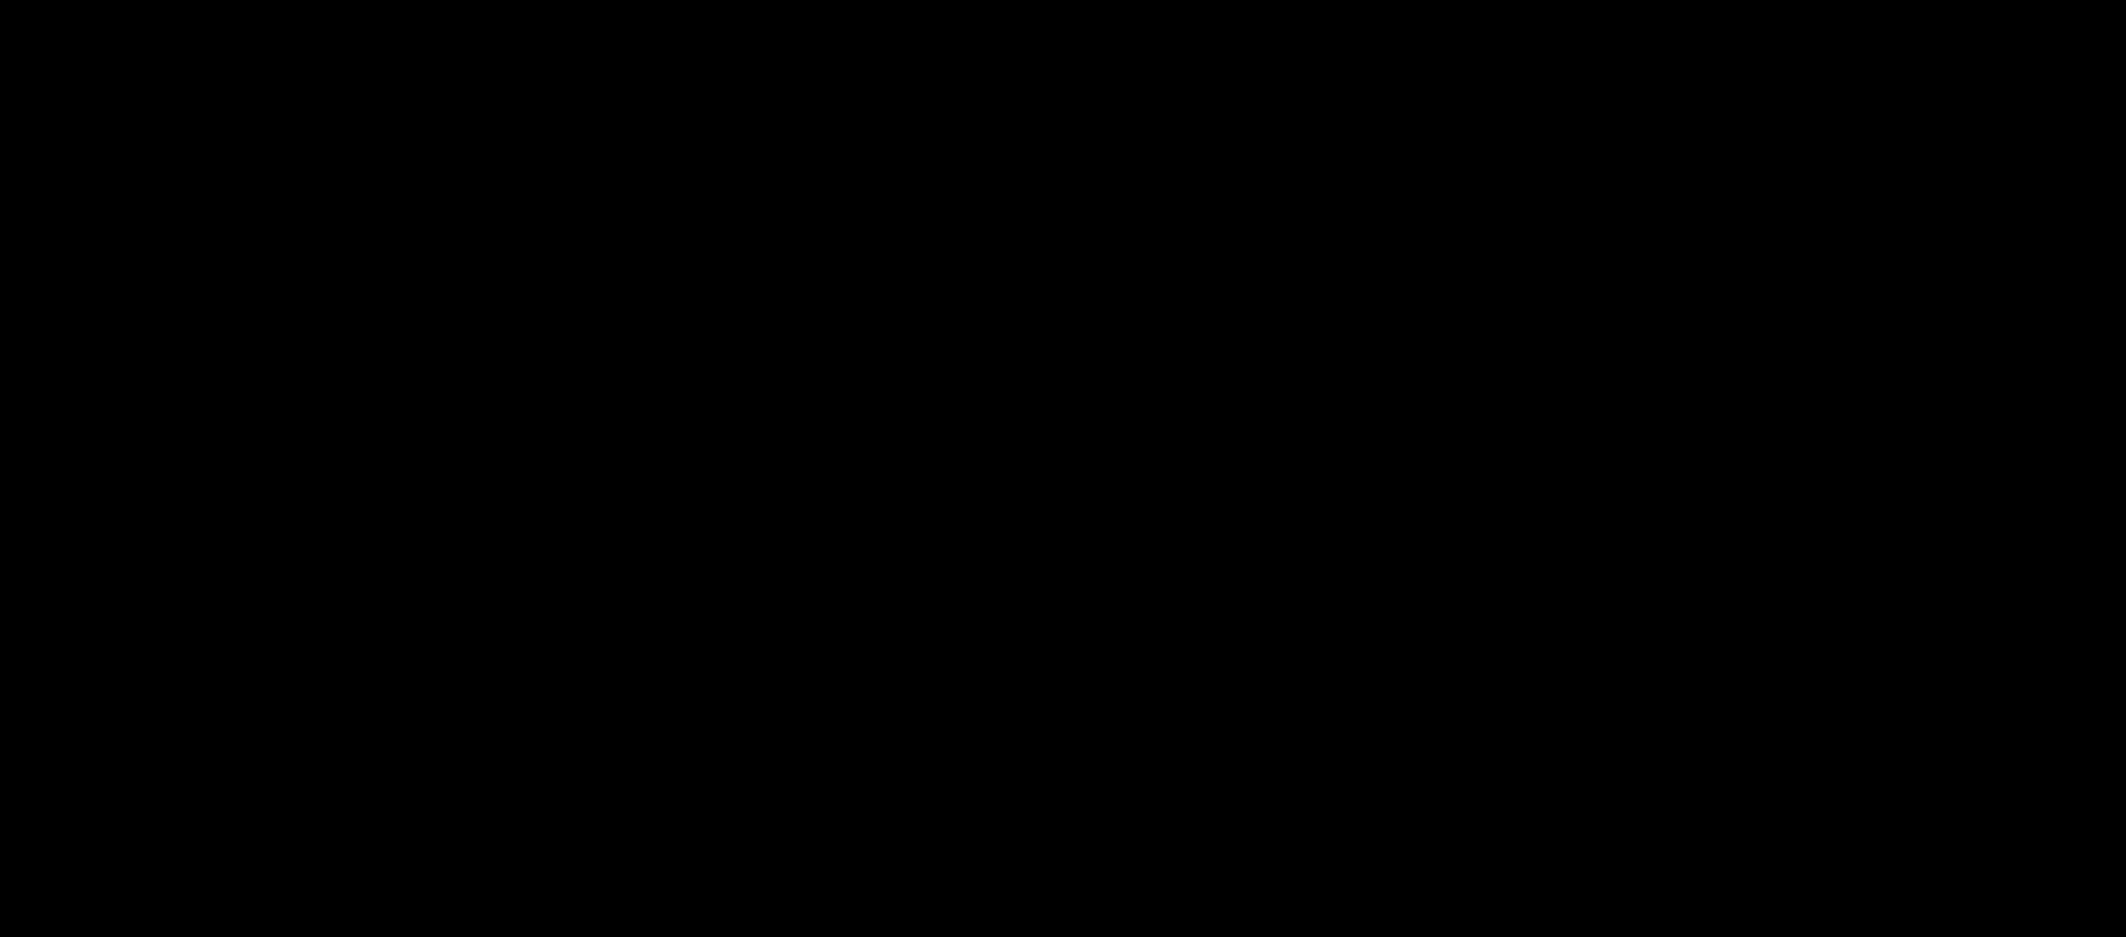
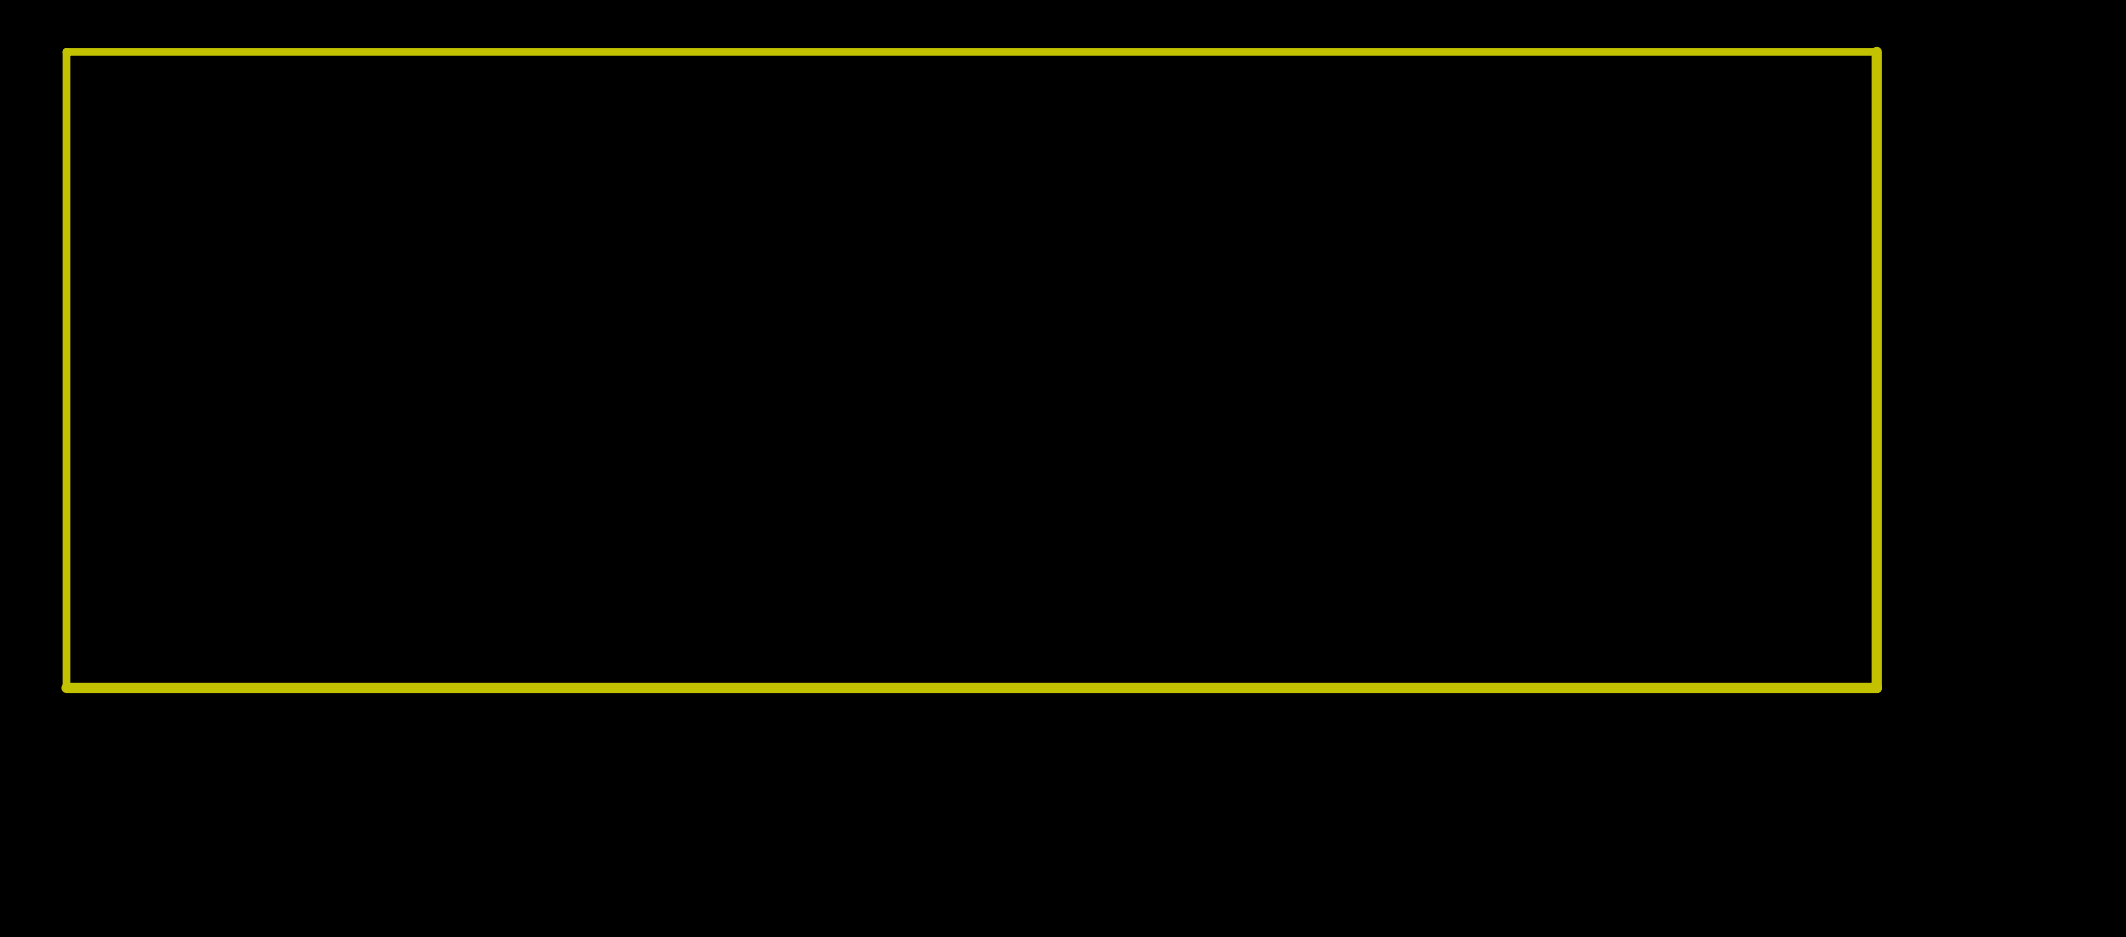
board edge: none -> (66, 51) (1876, 51) (1876, 687) (66, 687) (66, 51)

